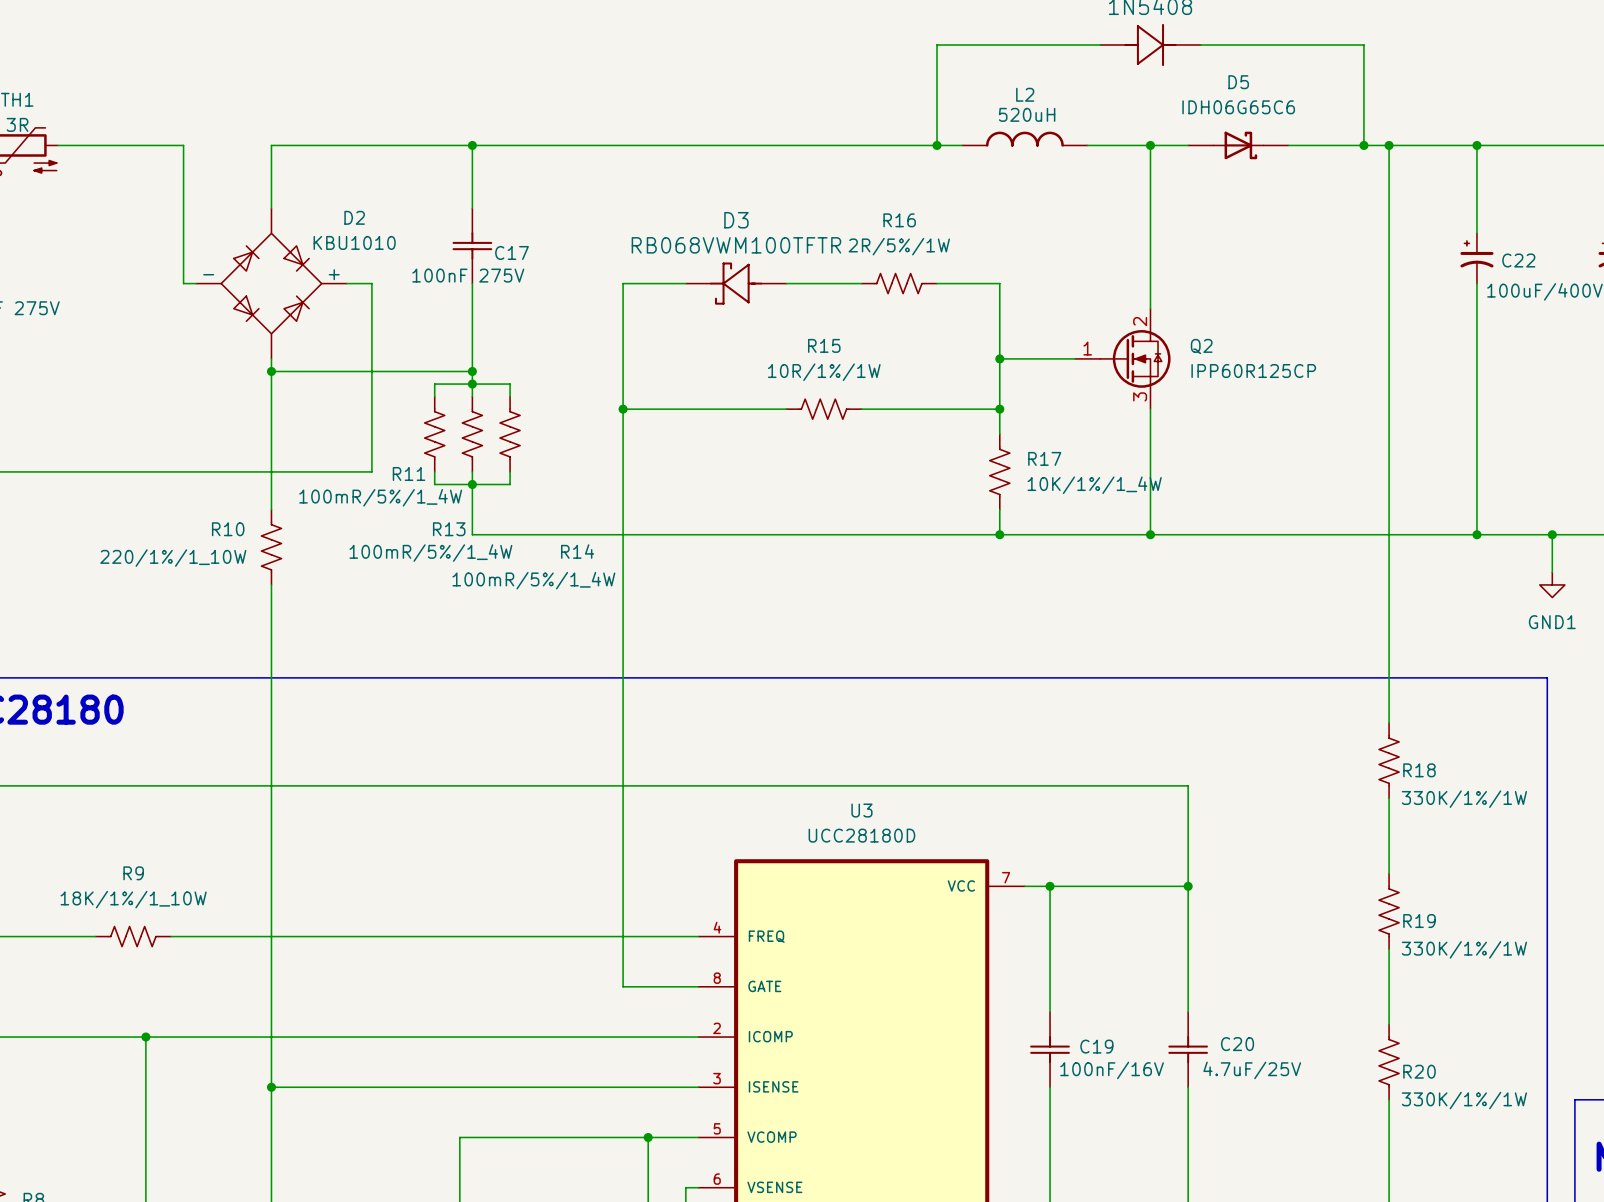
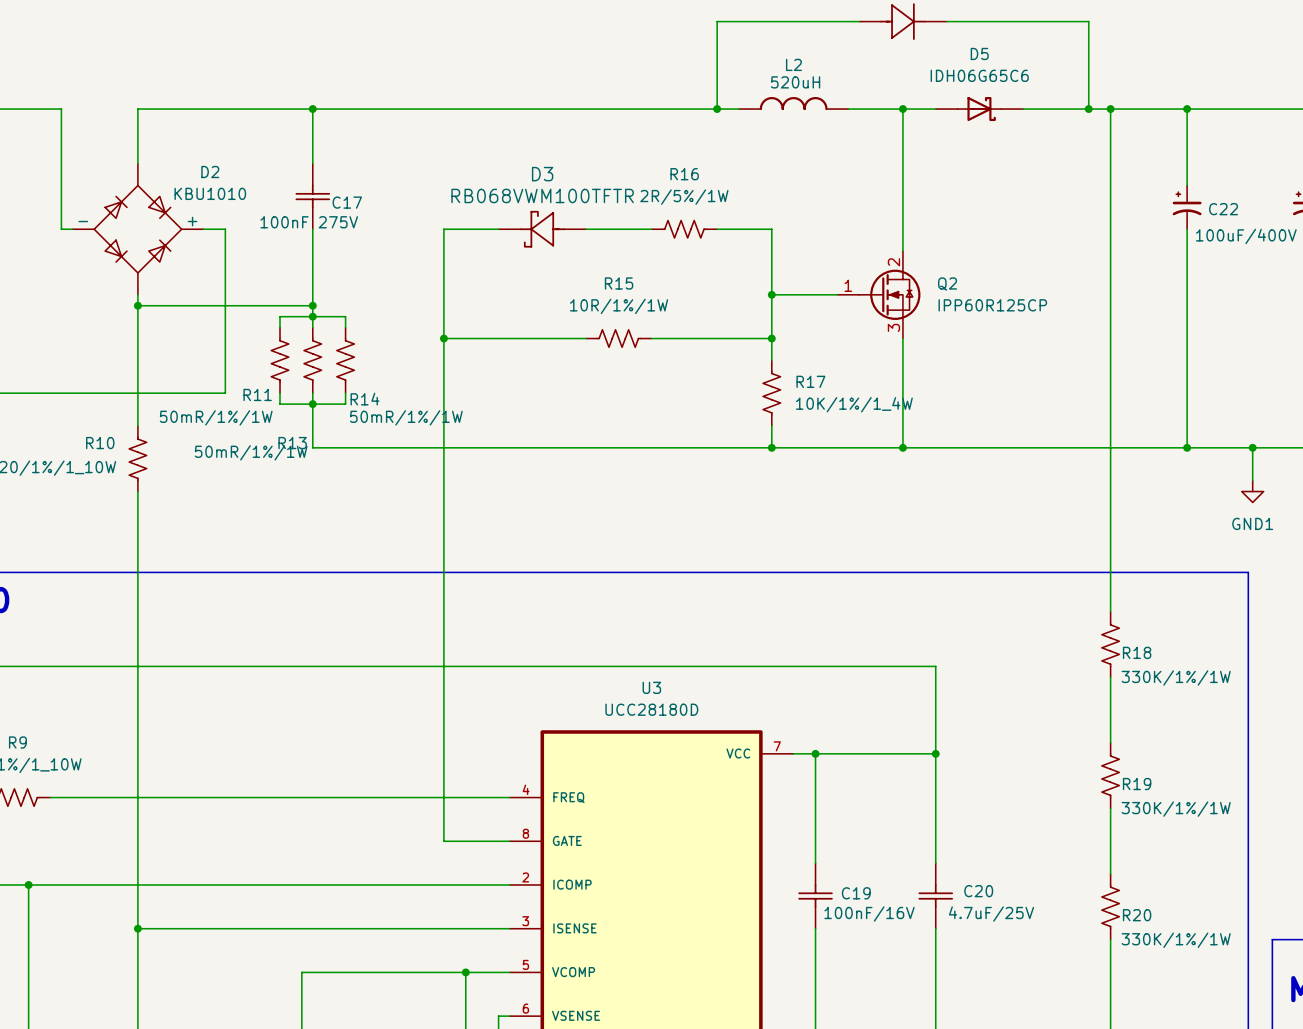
R11 value: 100mR/5%/1_4W (380, 497) -> 50mR/1%/1W (216, 417)
R14 name position: R14 (577, 551) -> R14 (365, 399)
R13 value: 100mR/5%/1_4W (430, 553) -> 50mR/1%/1W (251, 452)
R14 value: 100mR/5%/1_4W (533, 580) -> 50mR/1%/1W (406, 417)

